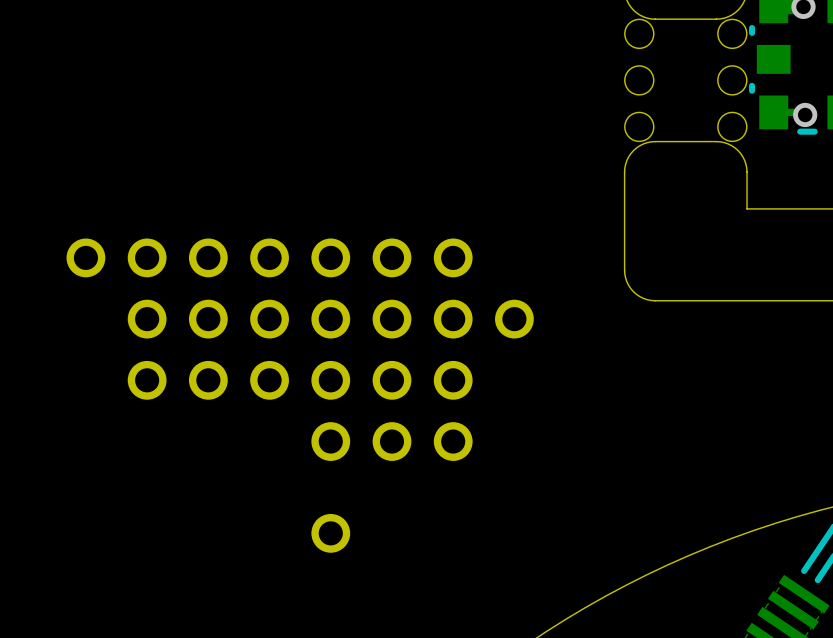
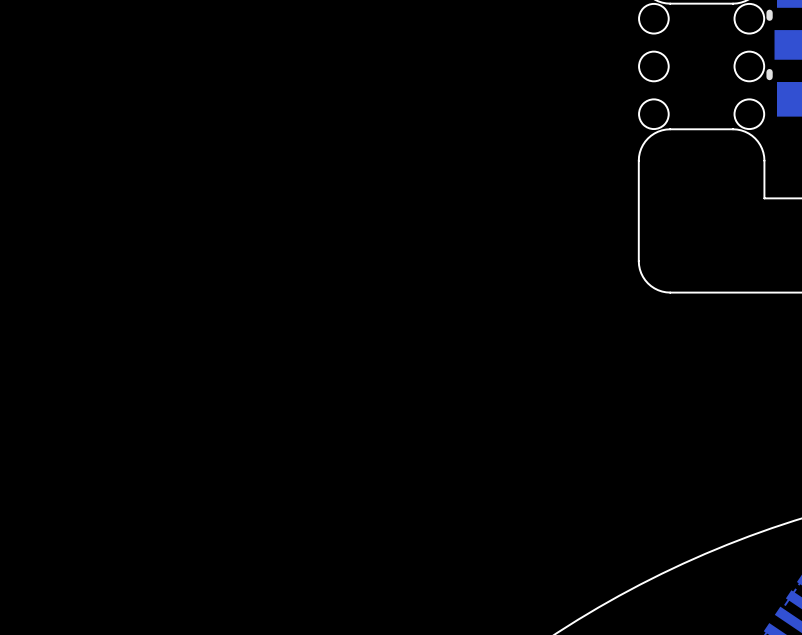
part: (85, 257) -> none
part: (147, 257) -> none
part: (208, 257) -> none
part: (269, 257) -> none
part: (330, 257) -> none
part: (391, 257) -> none
part: (453, 257) -> none
part: (147, 319) -> none
part: (208, 319) -> none
part: (269, 319) -> none
part: (330, 319) -> none
part: (391, 319) -> none
part: (453, 319) -> none
part: (514, 319) -> none
part: (147, 380) -> none
part: (208, 380) -> none
part: (269, 380) -> none
part: (330, 380) -> none
part: (391, 380) -> none
part: (453, 380) -> none
part: (330, 441) -> none
part: (391, 441) -> none
part: (453, 441) -> none
part: (330, 533) -> none

